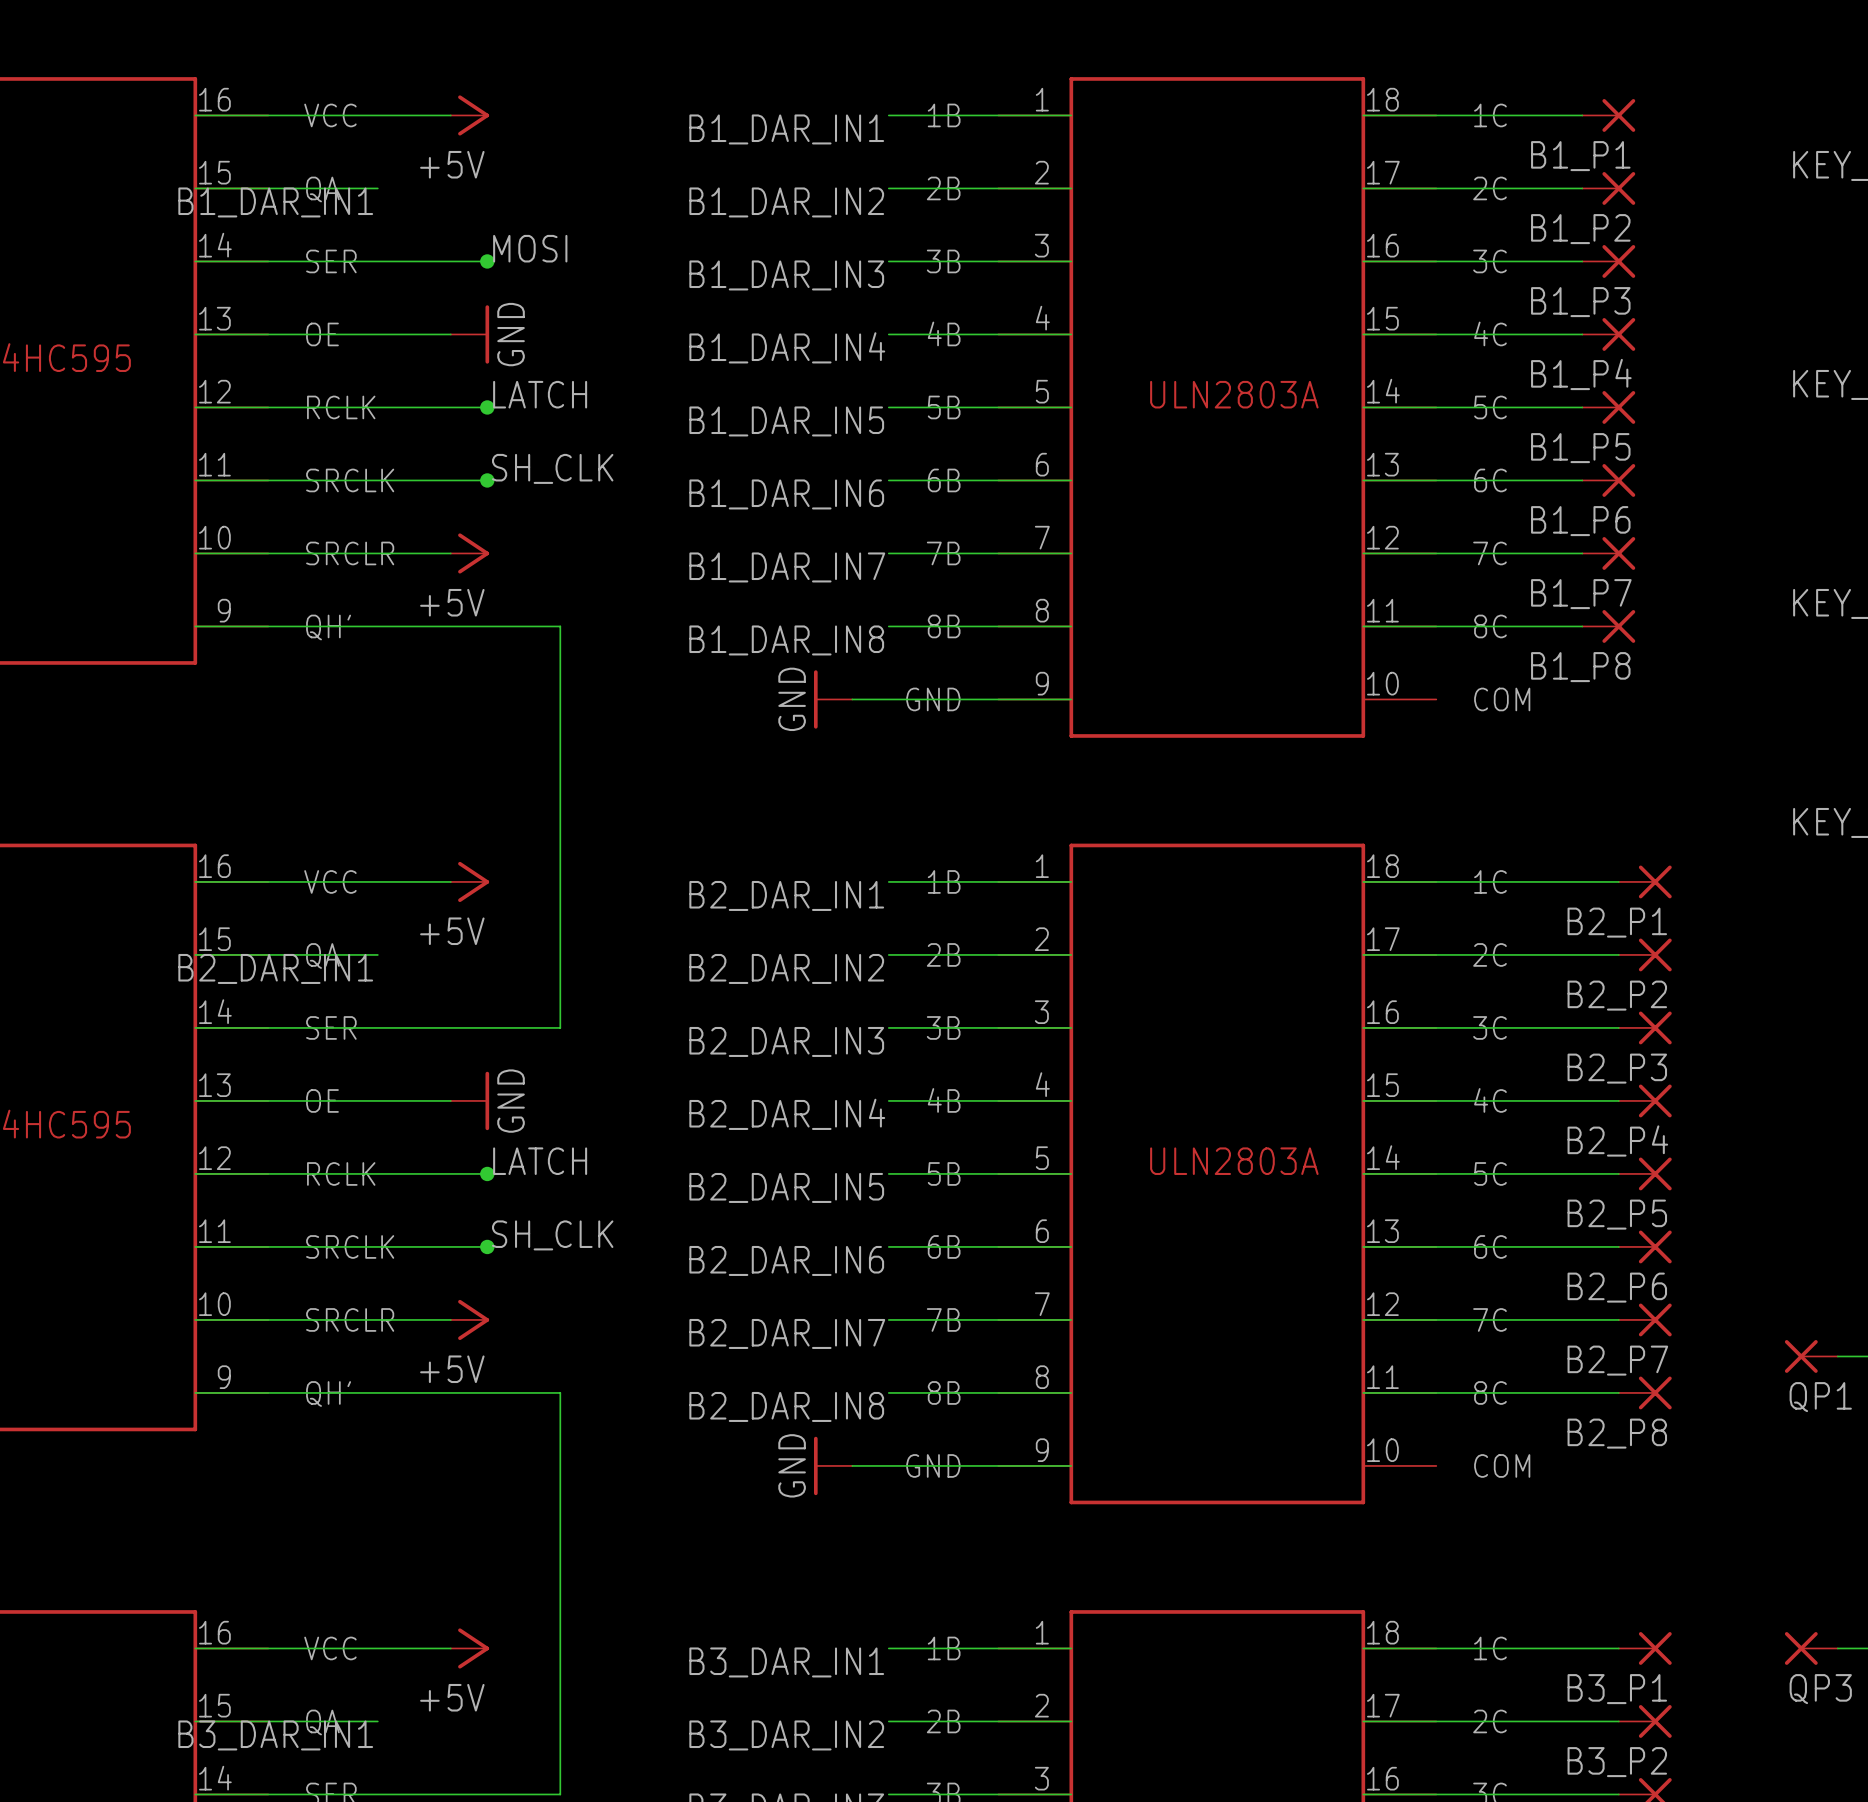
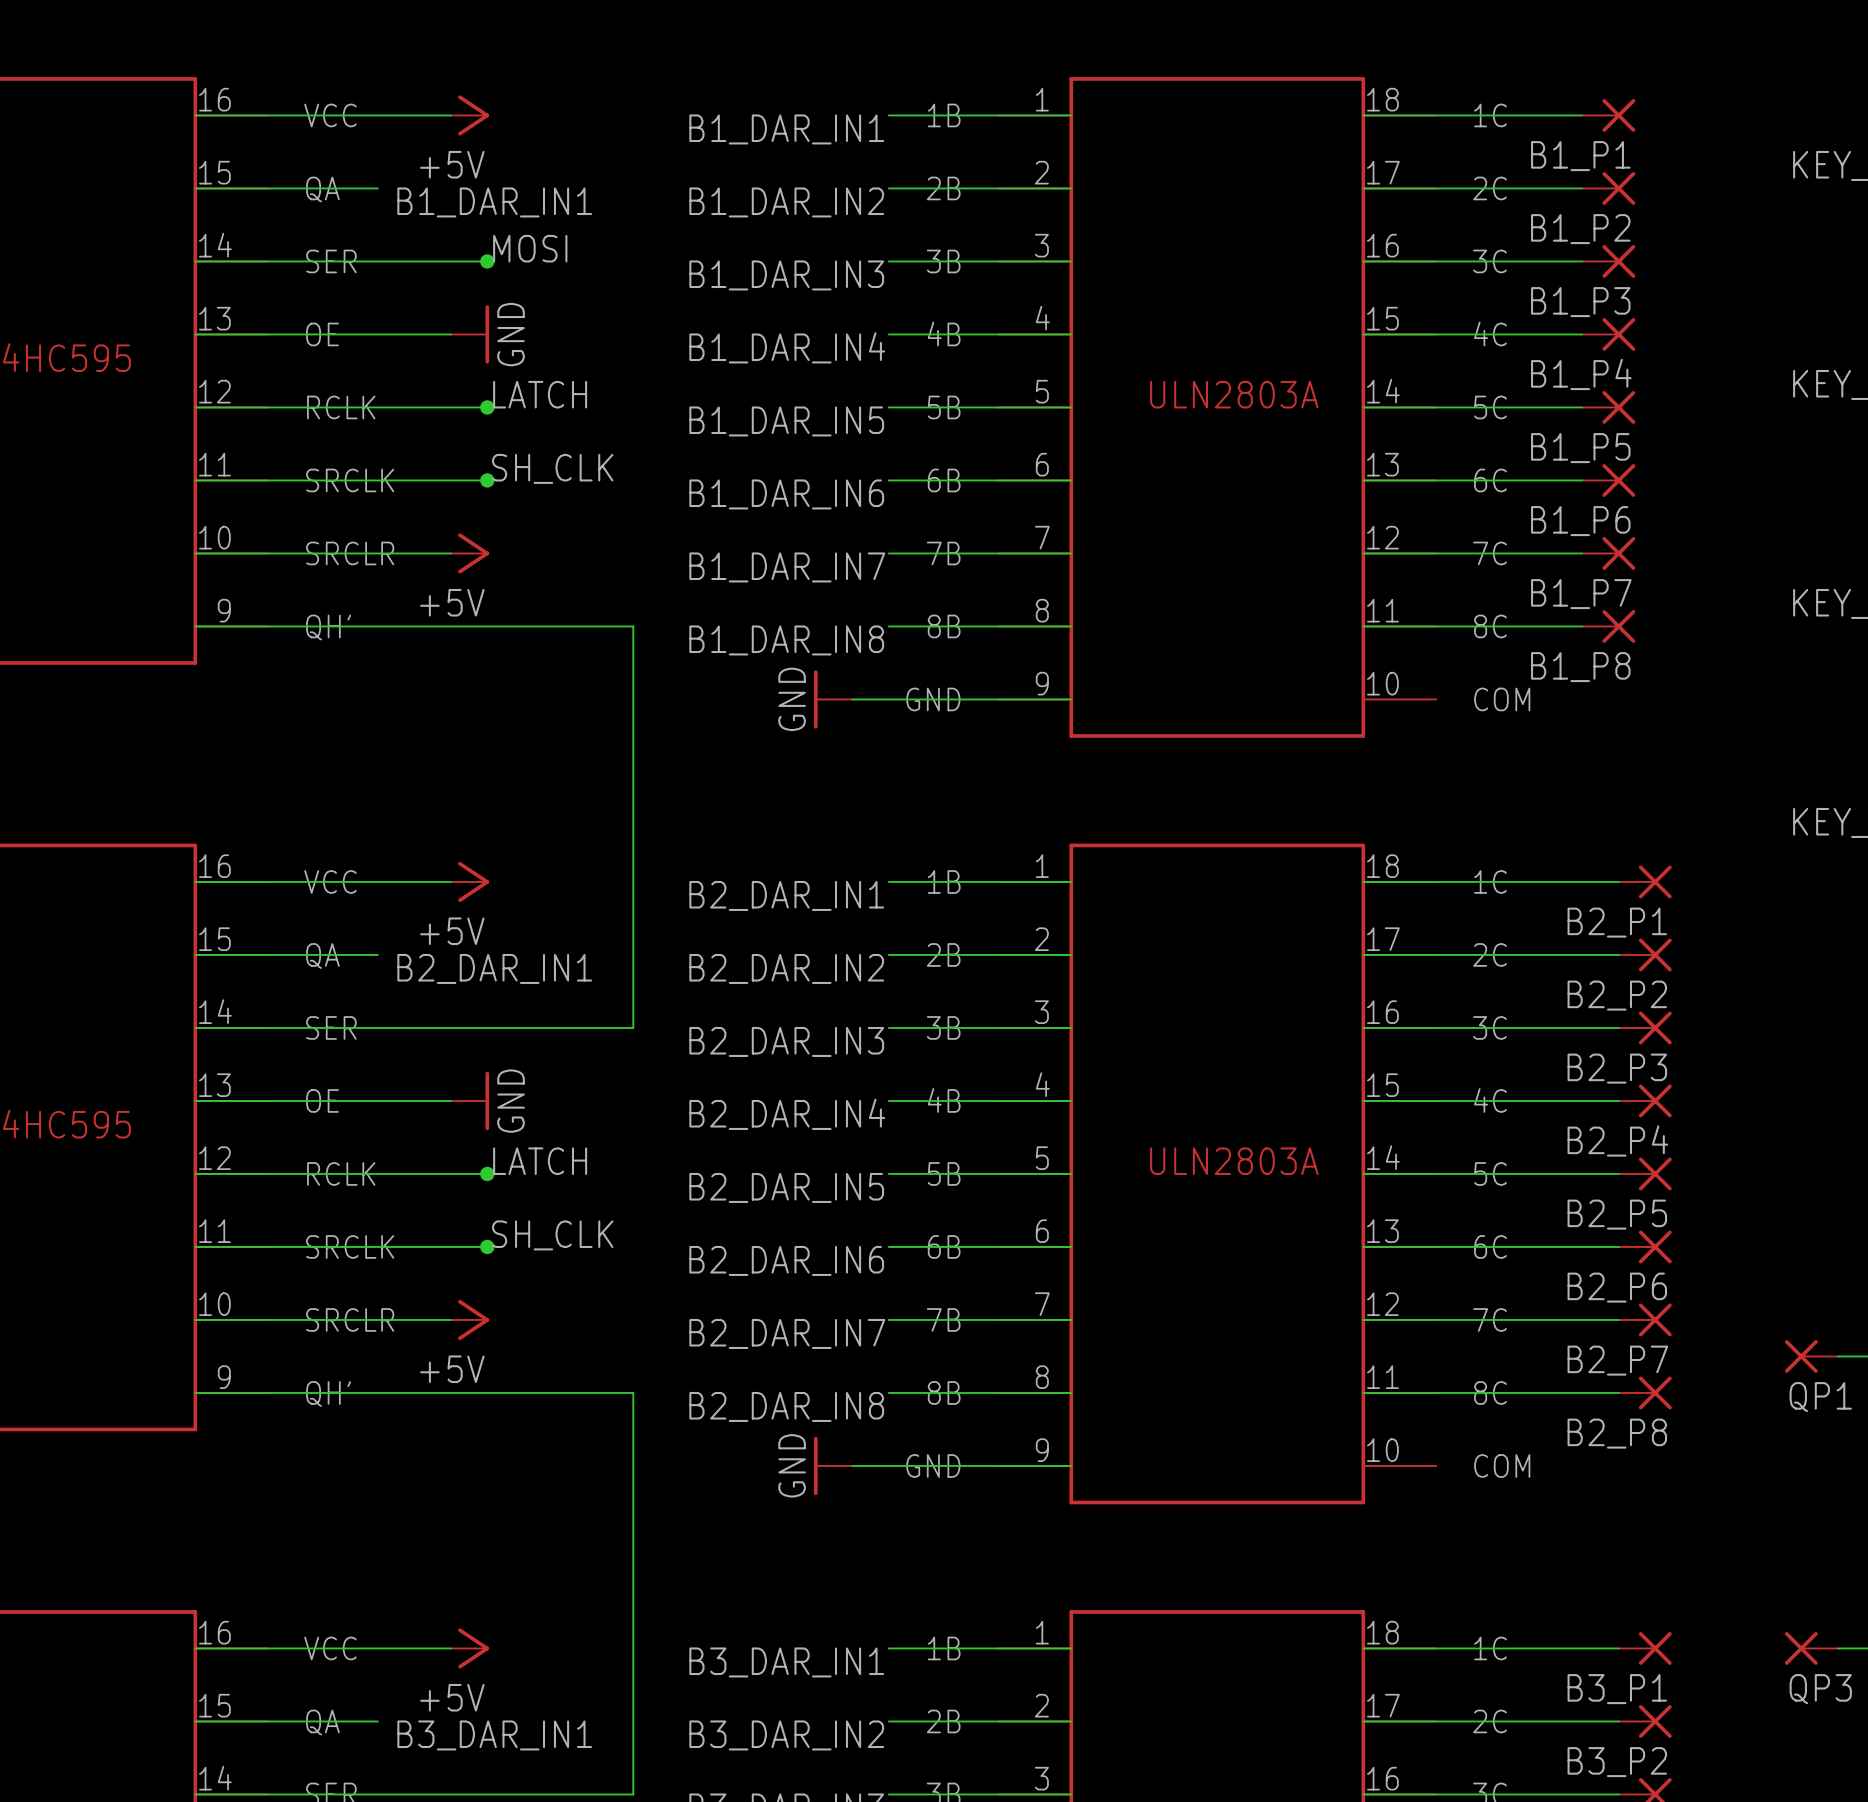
label position: B1_DAR_IN1 (275, 202) -> B1_DAR_IN1 (494, 202)
wire: (560, 626) (560, 1027) -> (560, 626) (633, 626) (633, 1027) (560, 1027)
label position: B2_DAR_IN1 (275, 968) -> B2_DAR_IN1 (494, 968)
wire: (560, 1392) (560, 1794) -> (560, 1392) (633, 1392) (633, 1794) (560, 1794)
label position: B3_DAR_IN1 (275, 1735) -> B3_DAR_IN1 (494, 1735)

